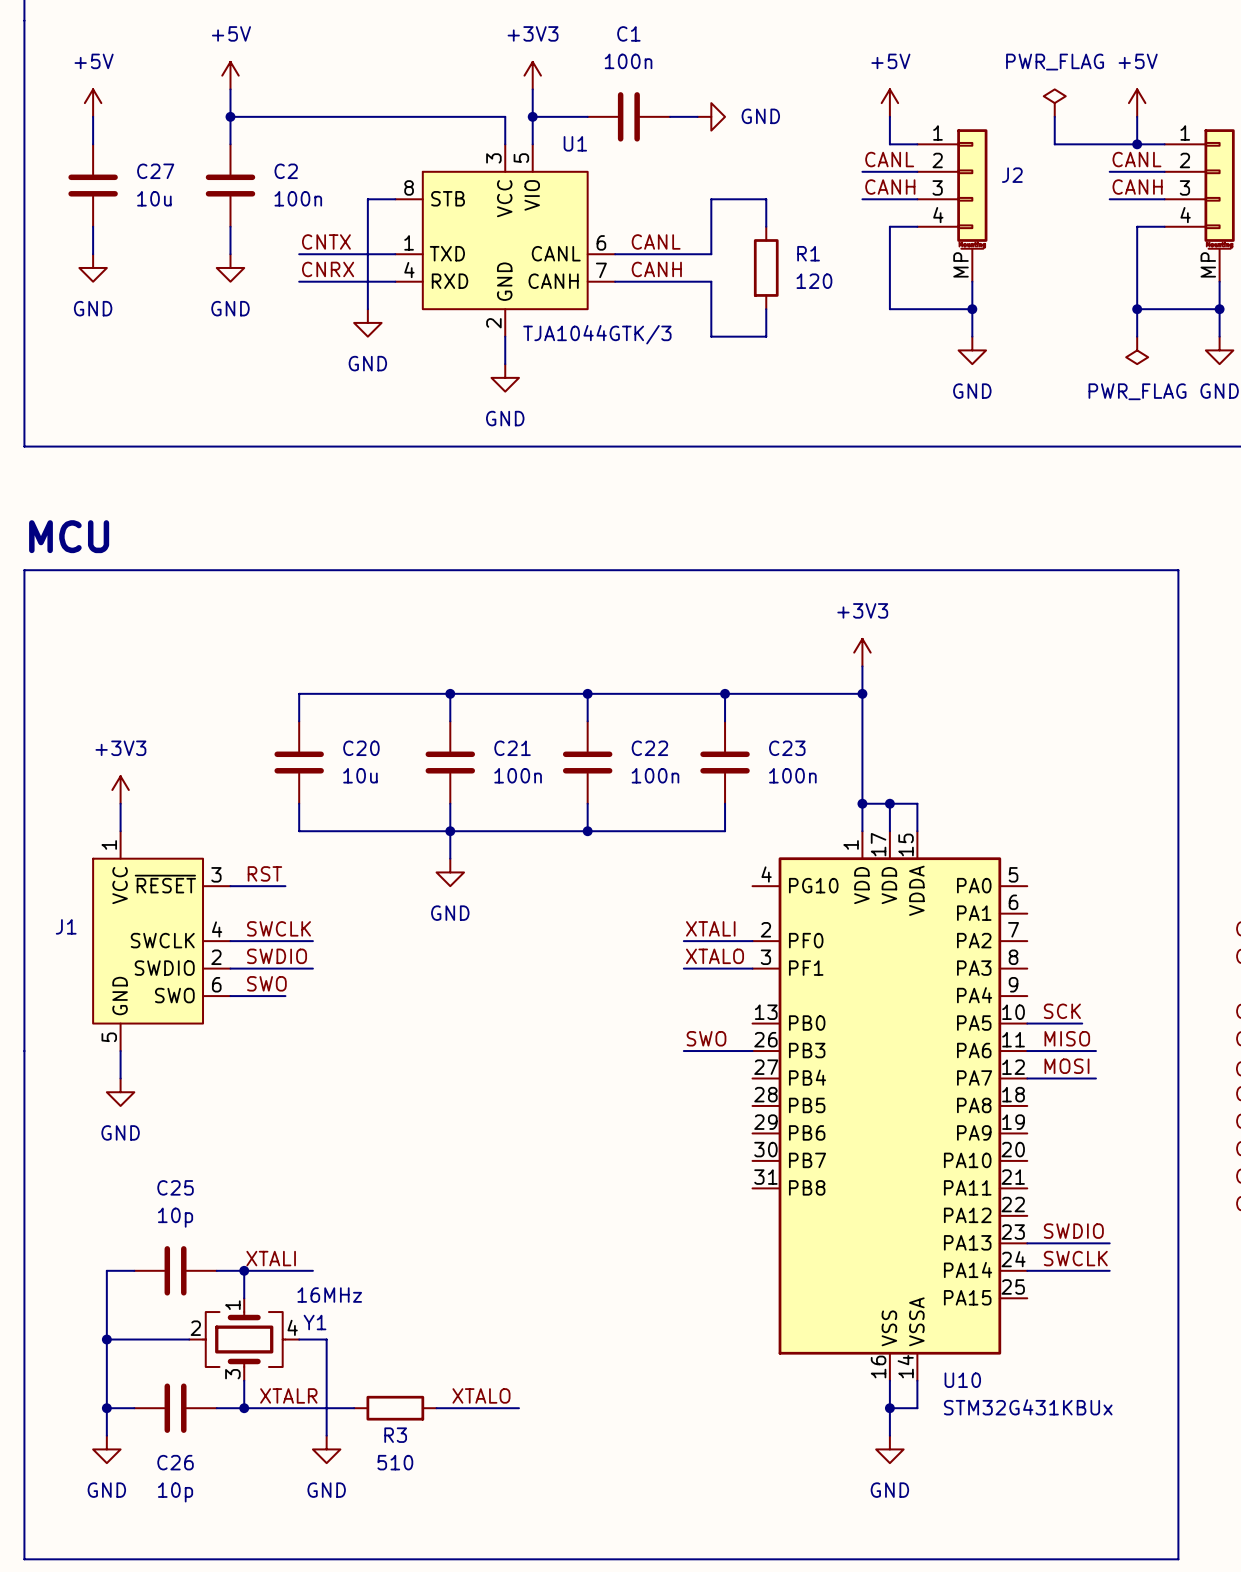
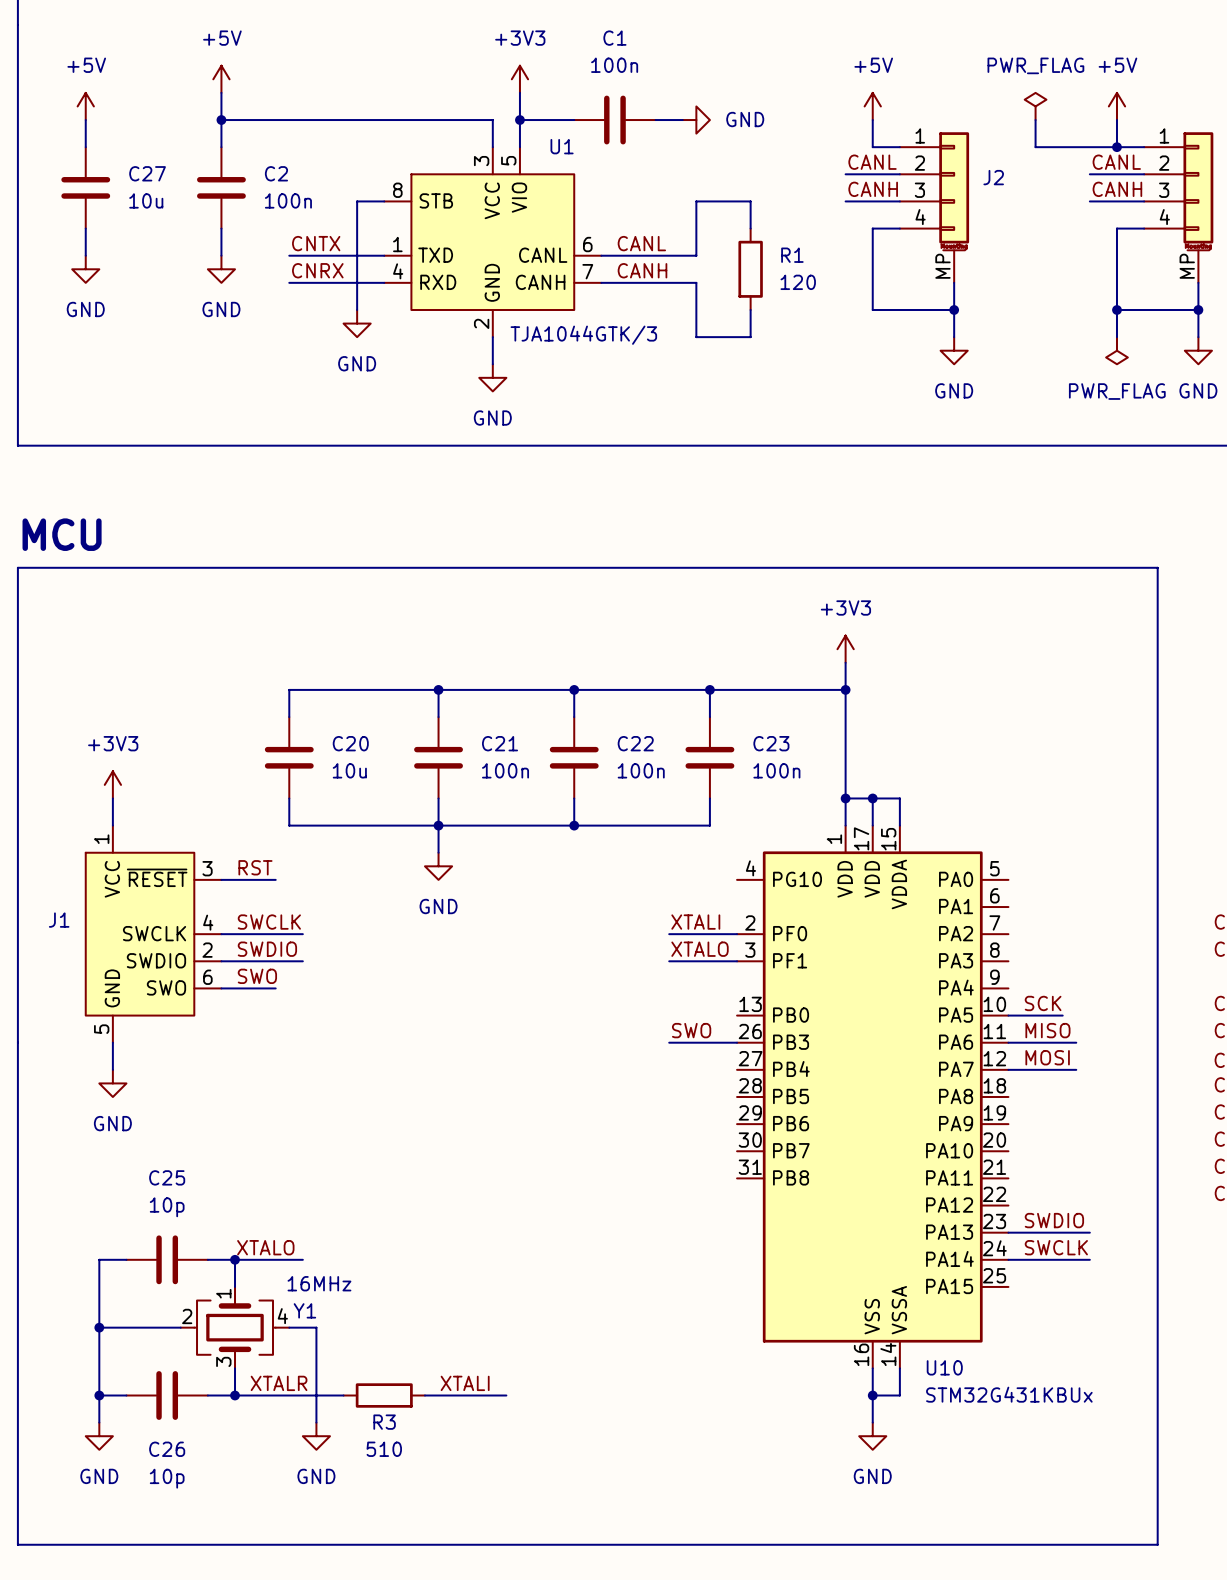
label: XTALI (271, 1258) -> XTALO (265, 1247)
label: XTALO (481, 1395) -> XTALI (465, 1383)

